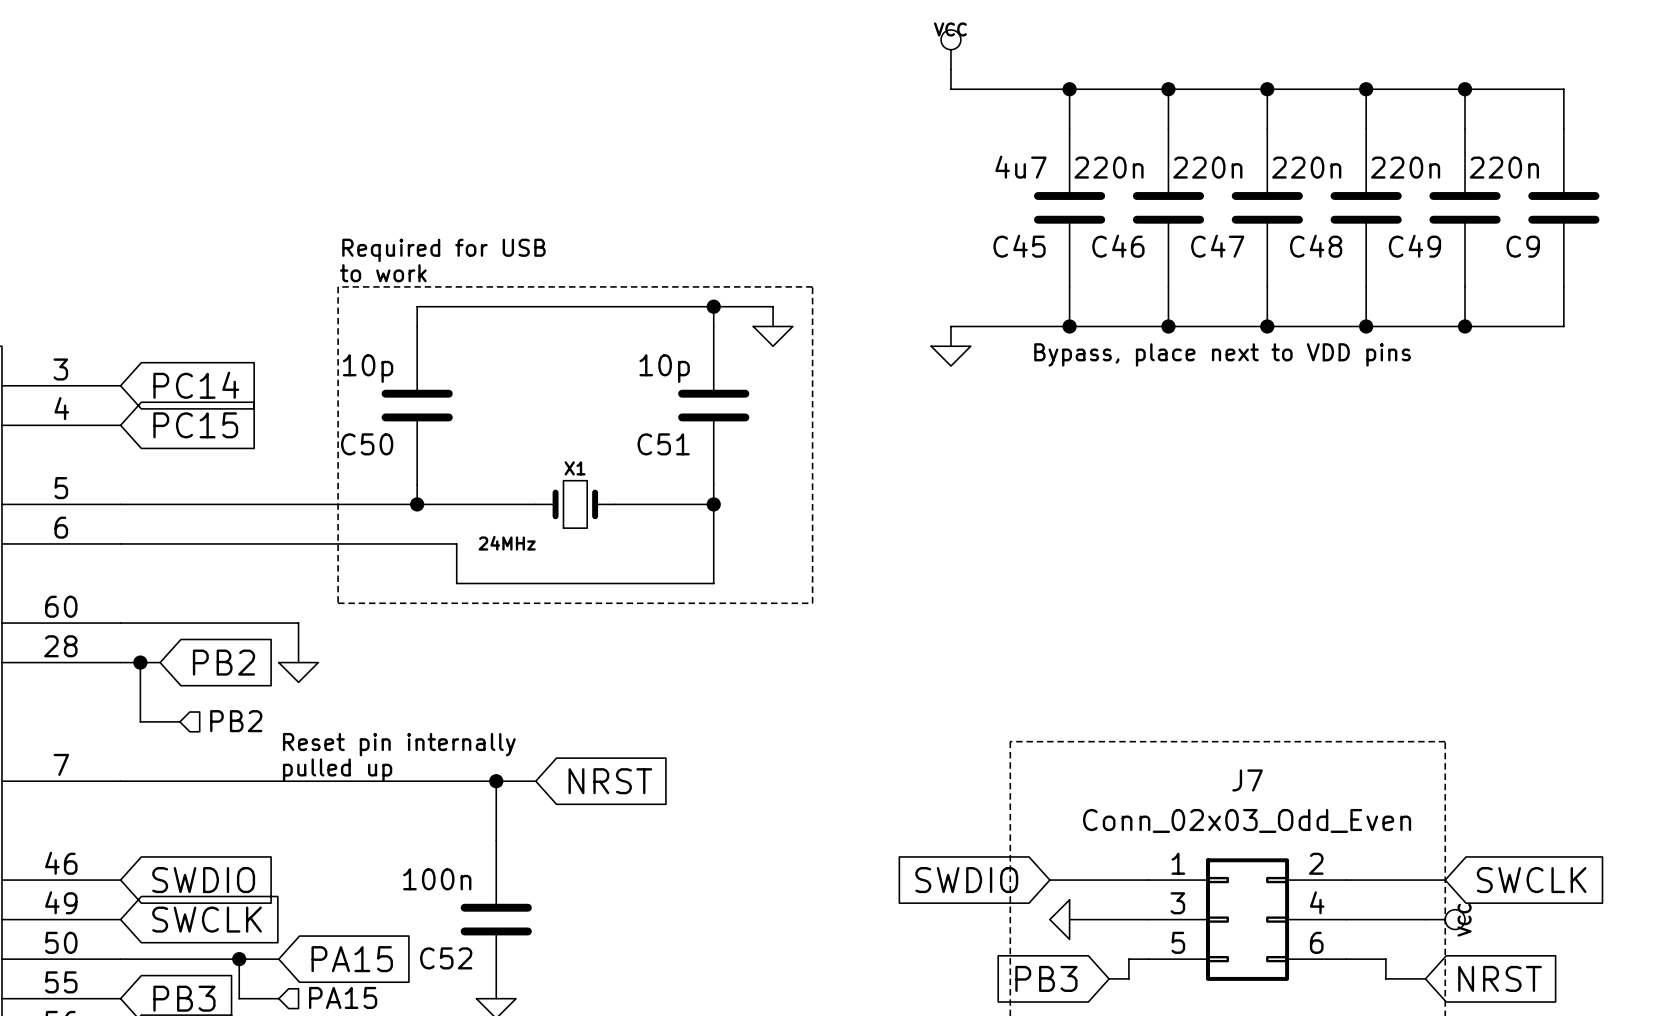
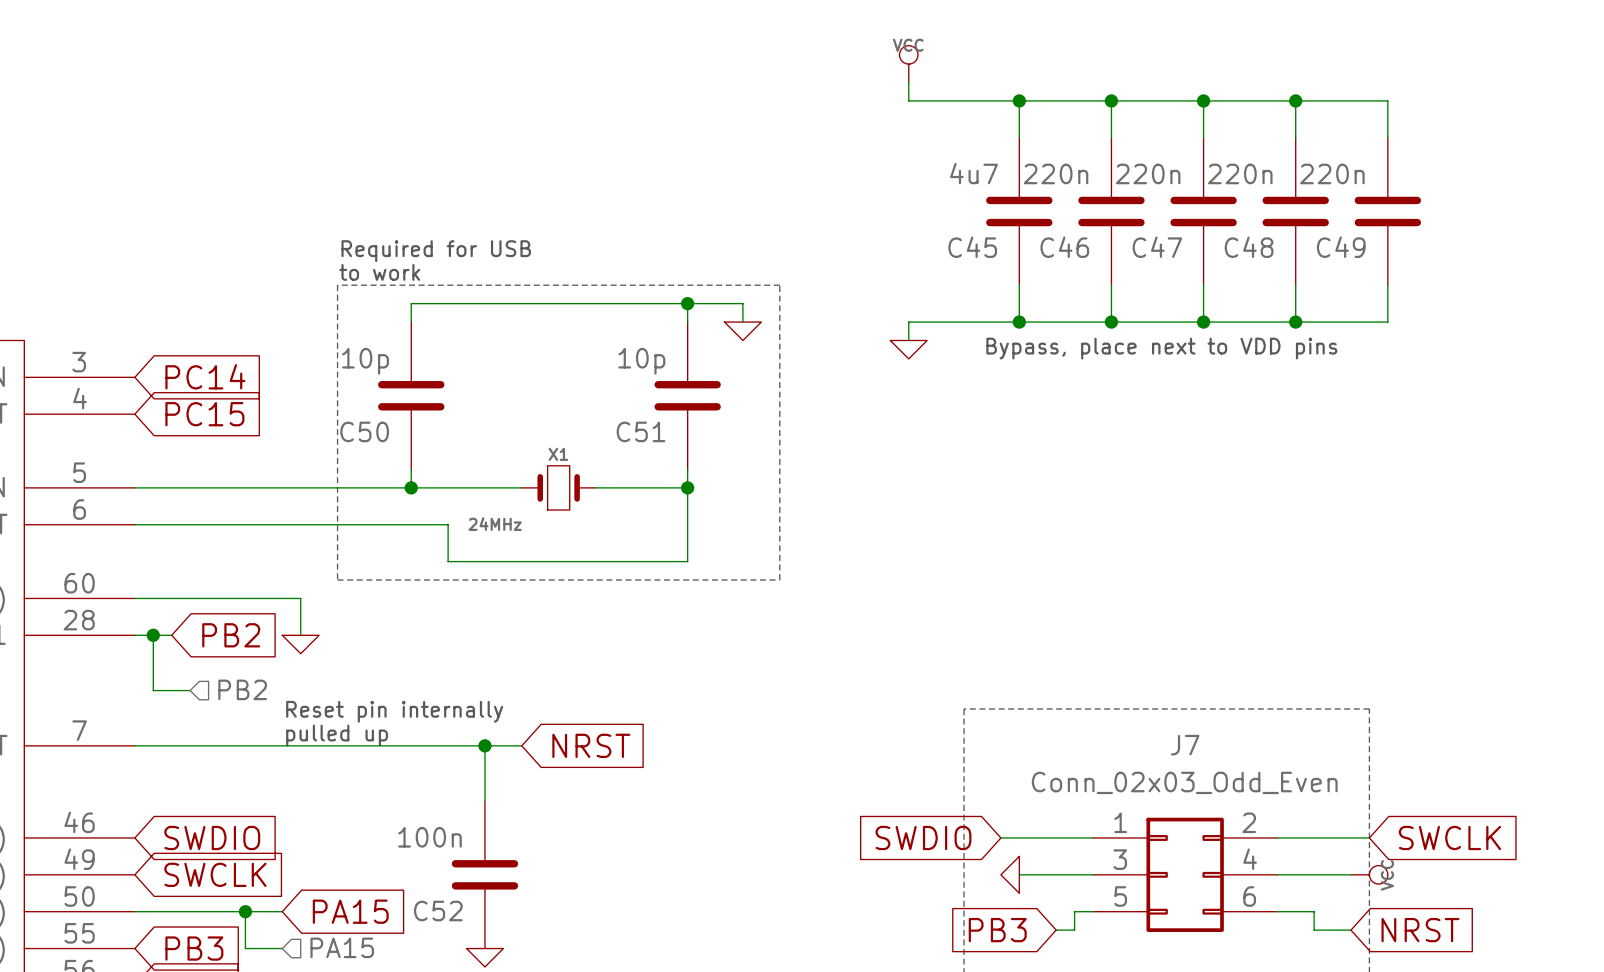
wire: (1465, 89) (1563, 89) (1563, 128) -> none
junction: (1465, 89) -> none
C9: 220n (1563, 207) -> none
wire: (1563, 286) (1563, 326) (1465, 326) -> none
junction: (1465, 326) -> none

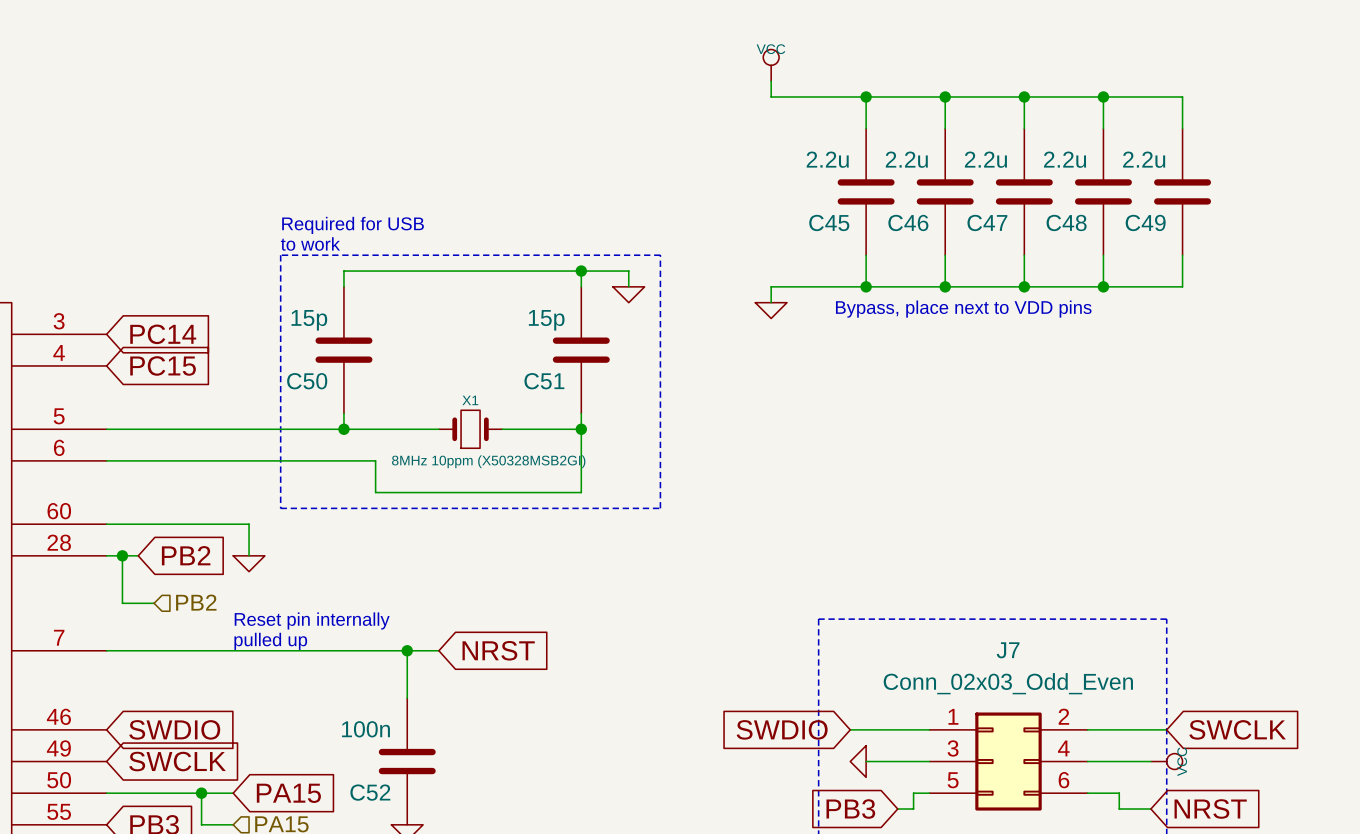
C45 value: 4u7 (973, 173) -> 2.2u (827, 159)
C46 value: 220n (1056, 173) -> 2.2u (906, 159)
C47 value: 220n (1148, 173) -> 2.2u (985, 159)
C48 value: 220n (1240, 173) -> 2.2u (1065, 159)
C49 value: 220n (1332, 173) -> 2.2u (1144, 159)
C50 value: 10p (365, 361) -> 15p (309, 320)
C51 value: 10p (641, 361) -> 15p (546, 320)
X1 value: 24MHz (495, 524) -> 8MHz 10ppm (X50328MSB2GI) (488, 461)

